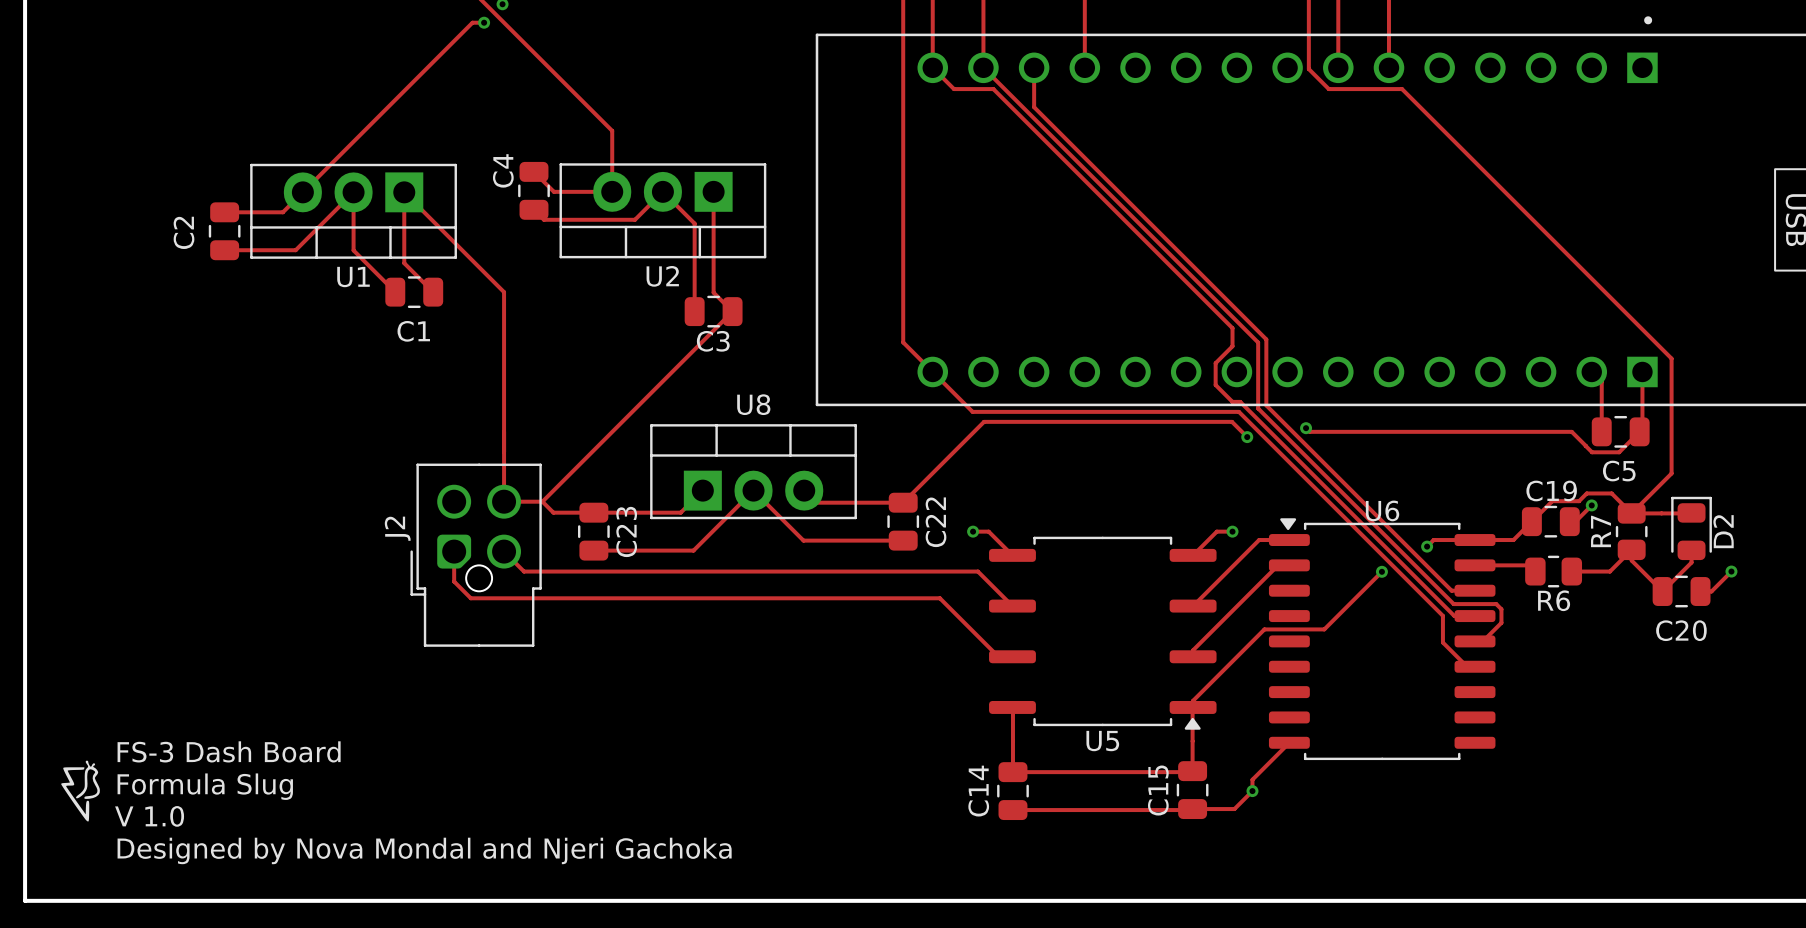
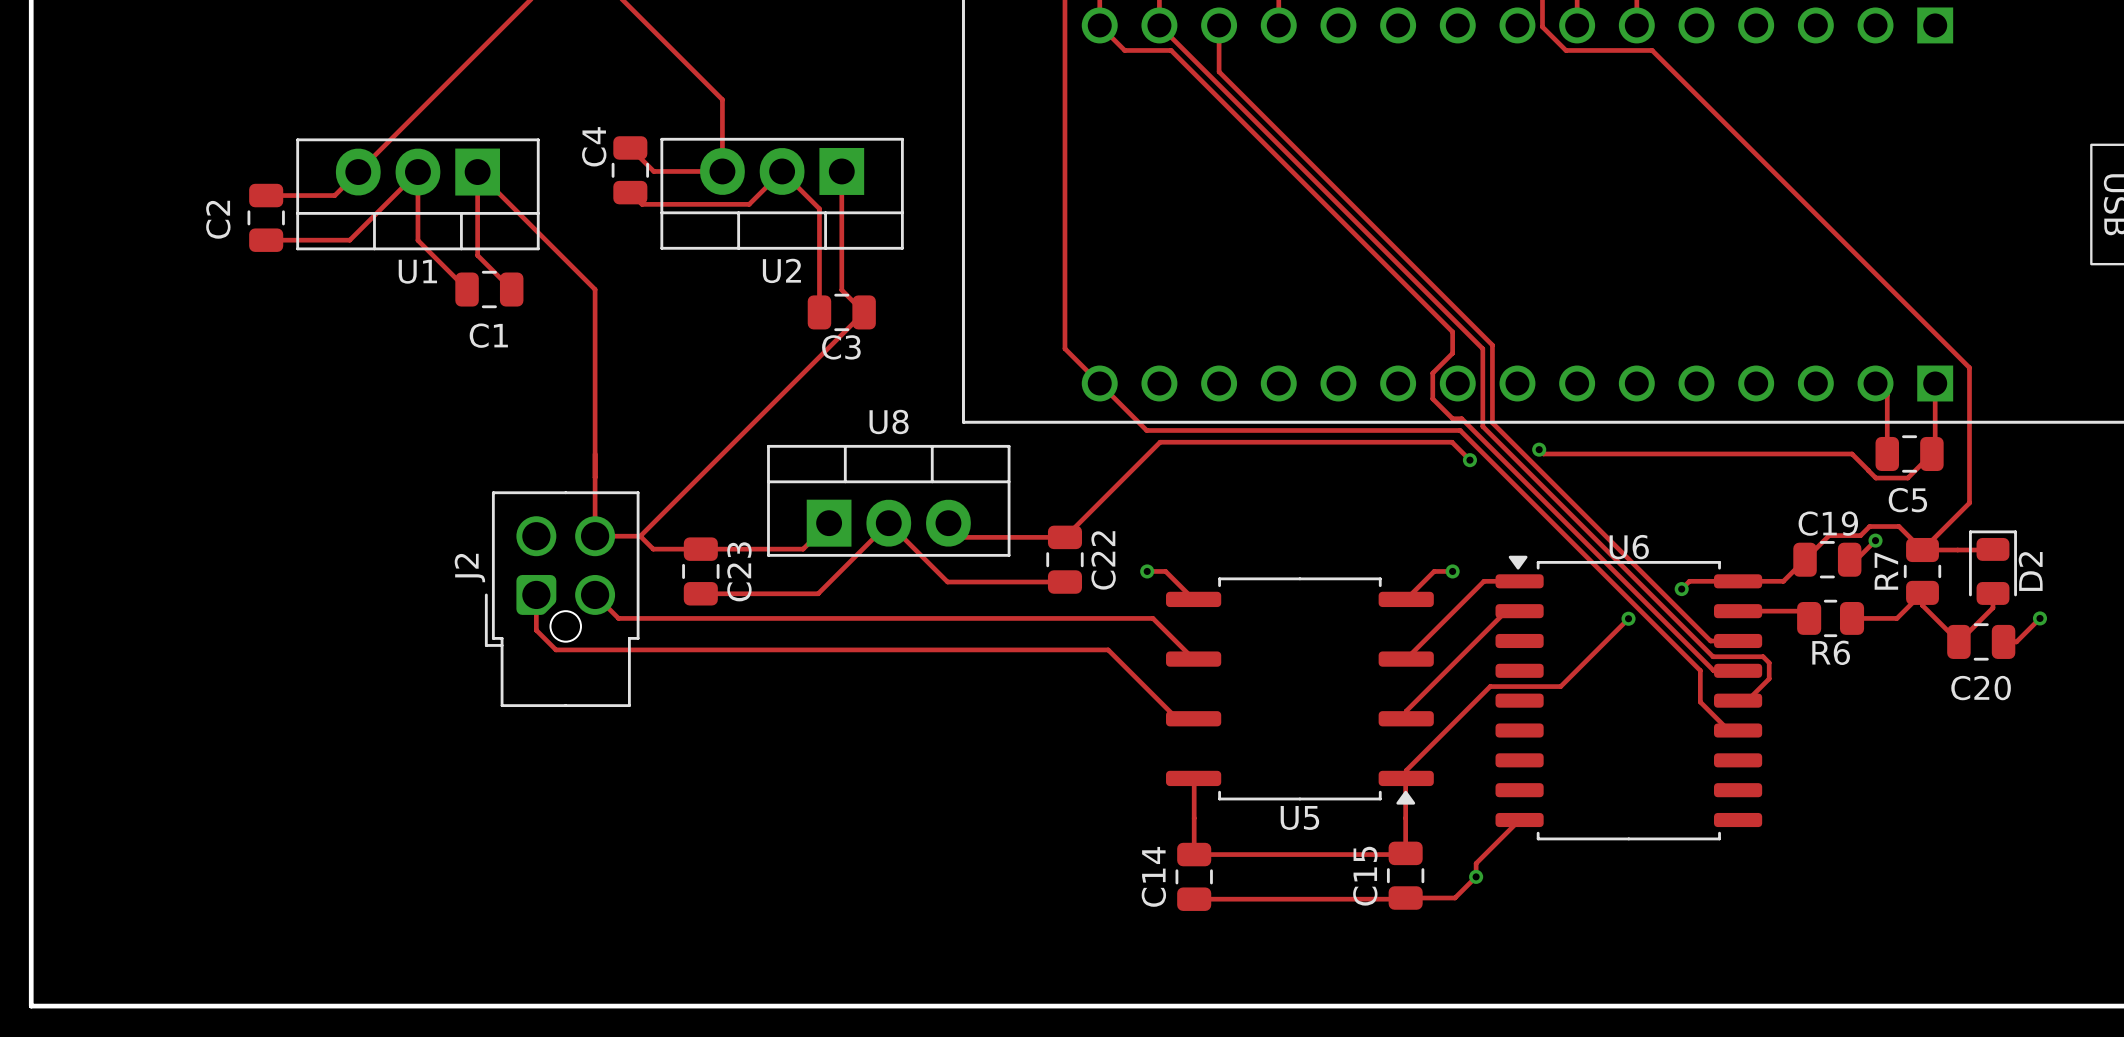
text: FS-3 Dash Board (229, 751) -> none
drawing: [61, 760, 100, 822] -> none
text: Formula Slug (205, 786) -> none
text: V 1.0 (149, 816) -> none
text: Designed by Nova Mondal and Njeri Gachoka (424, 850) -> none

